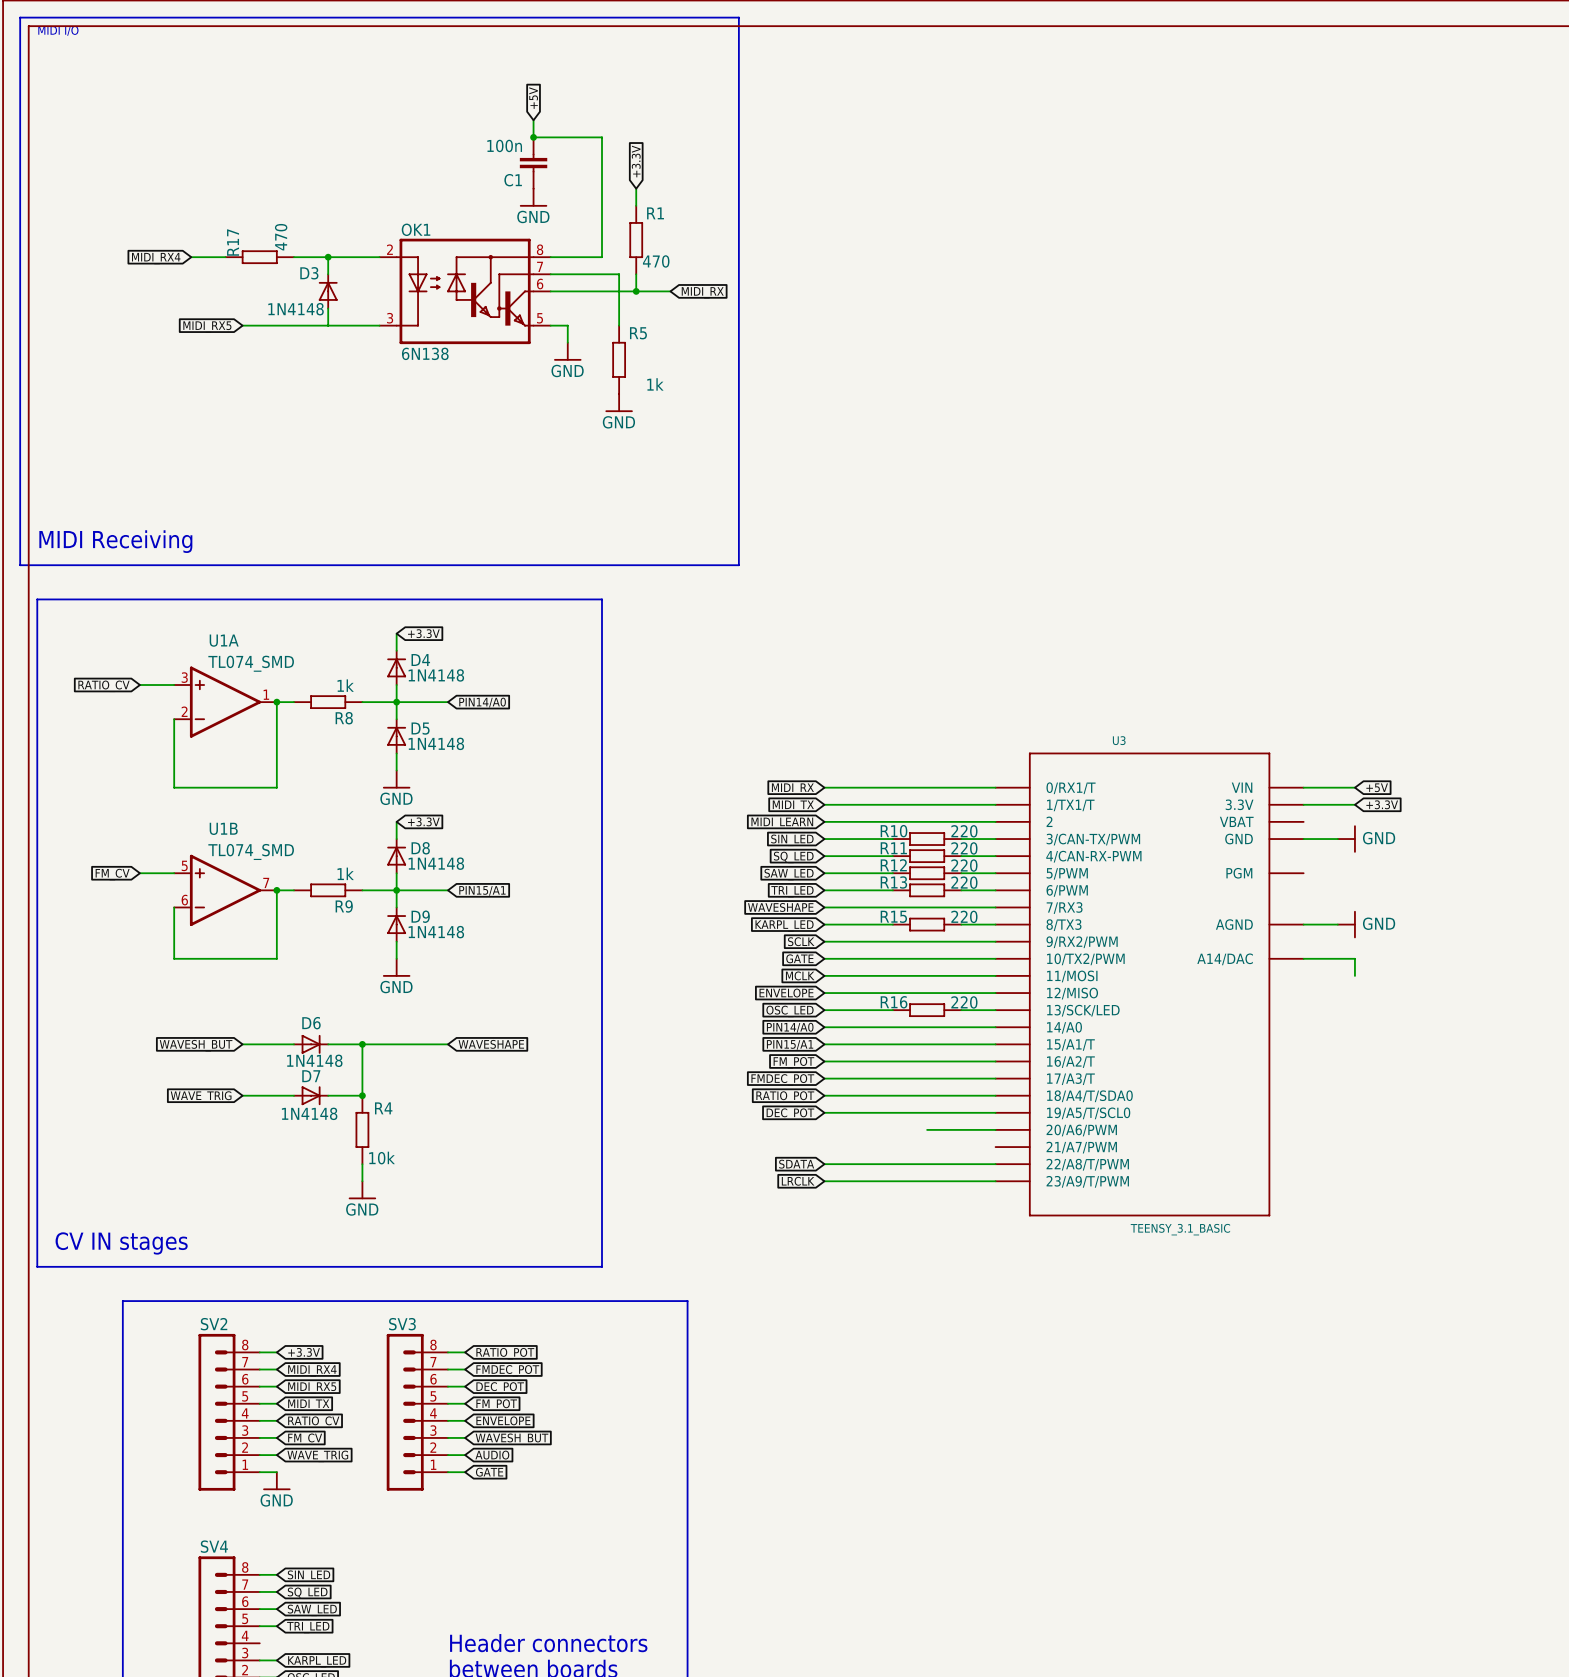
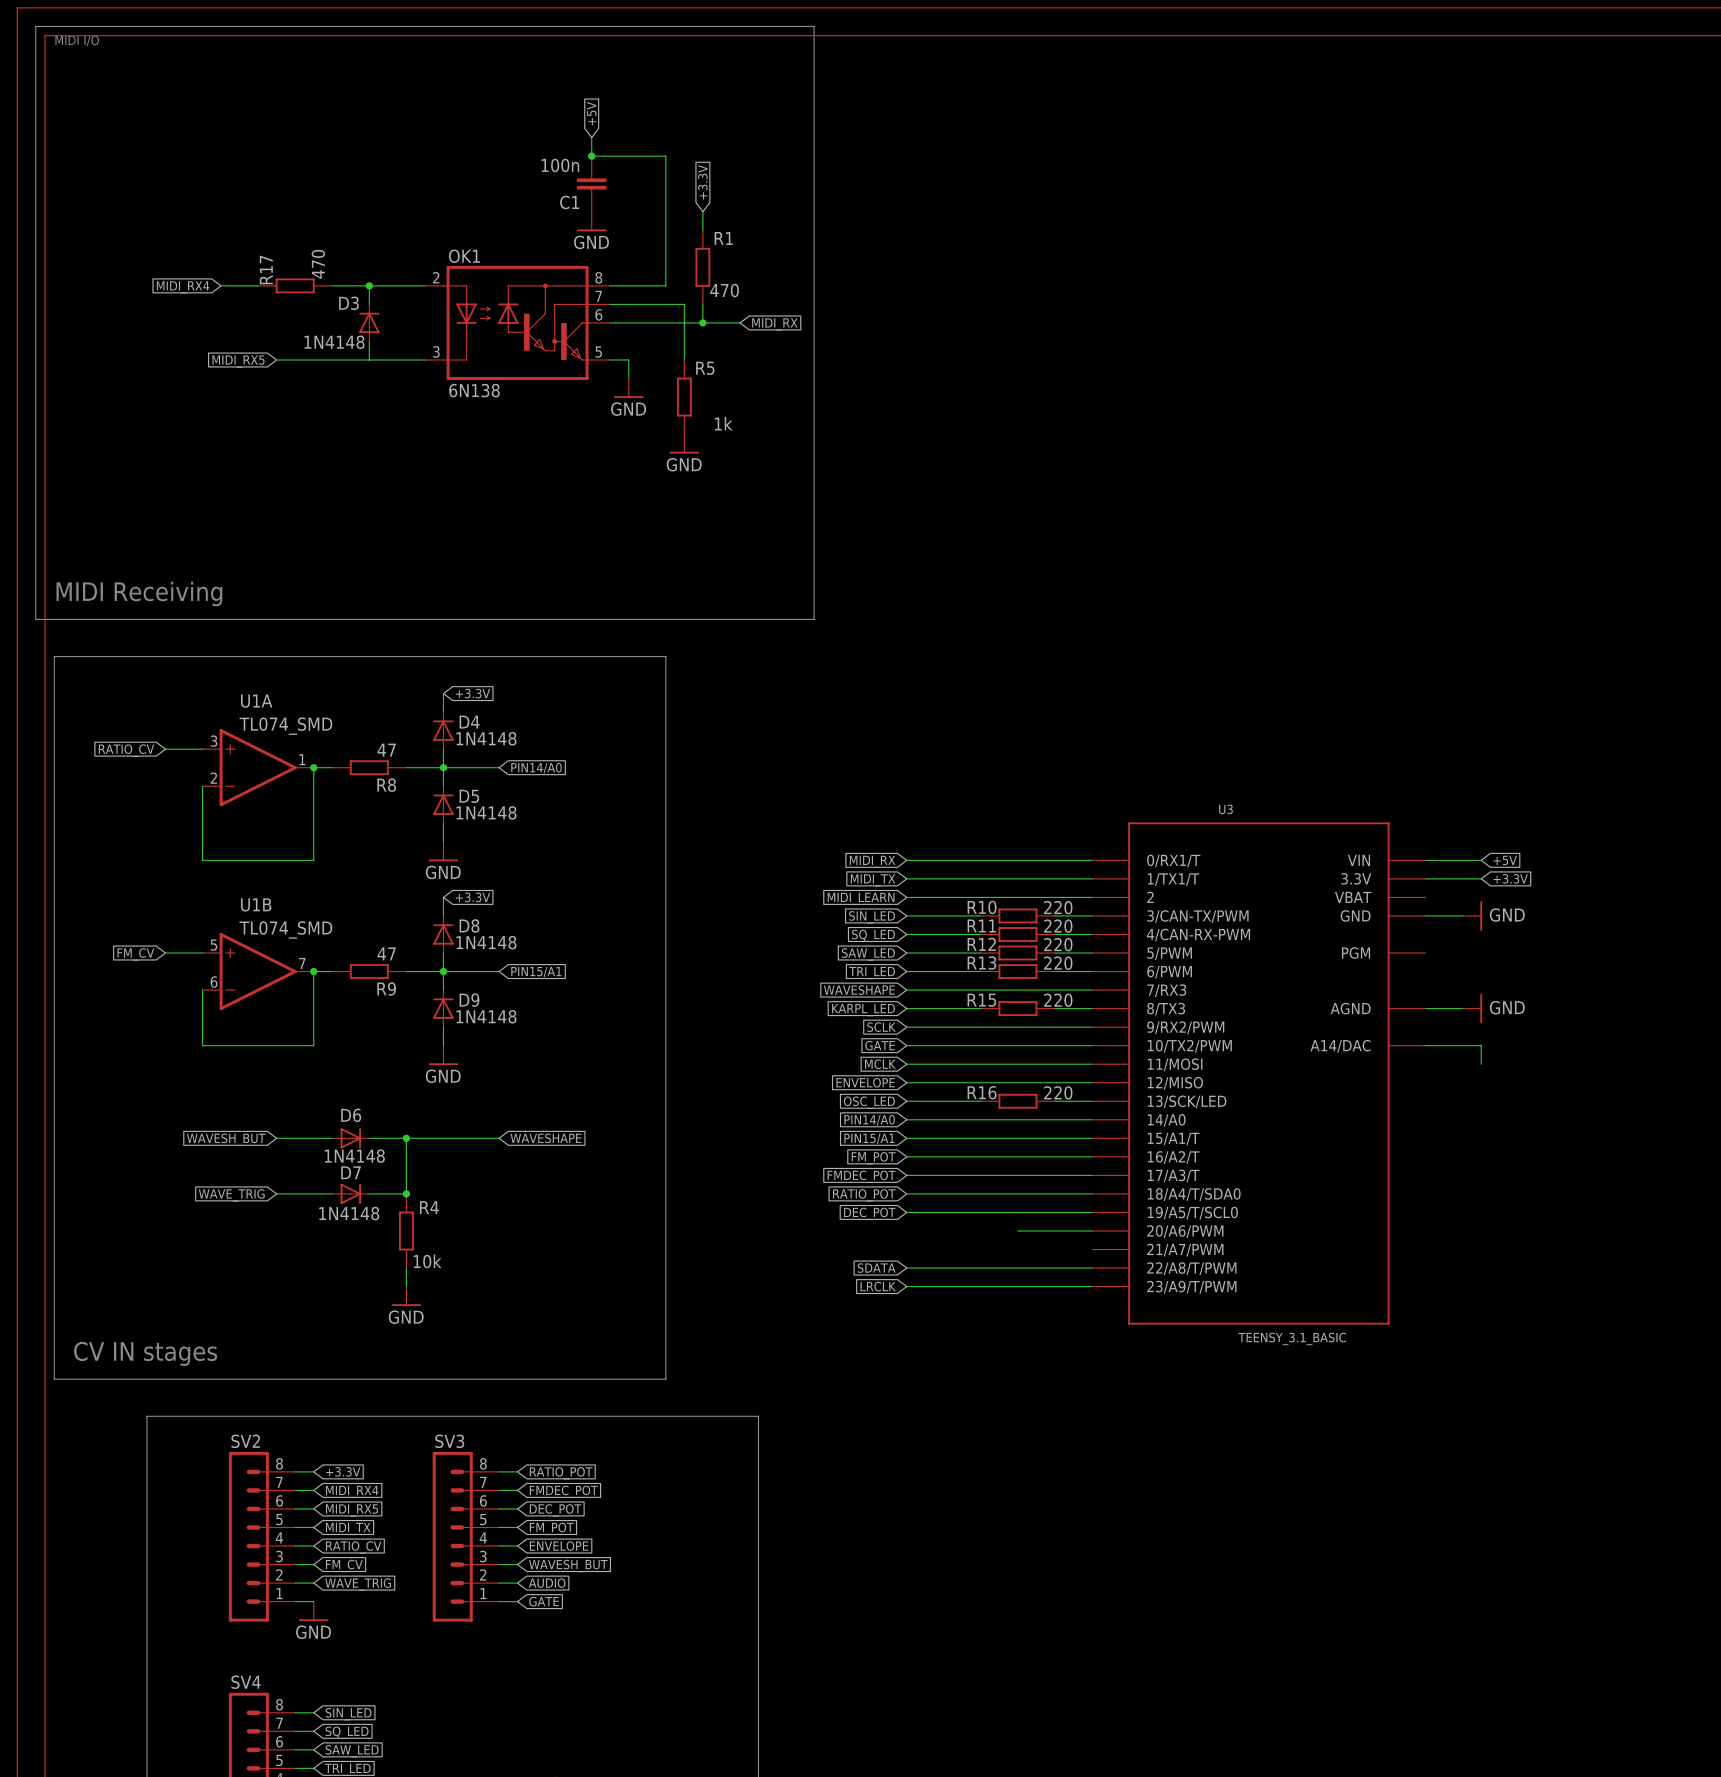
R8 value: 1k (345, 685) -> 47 (386, 750)
R9 value: 1k (345, 873) -> 47 (386, 953)

